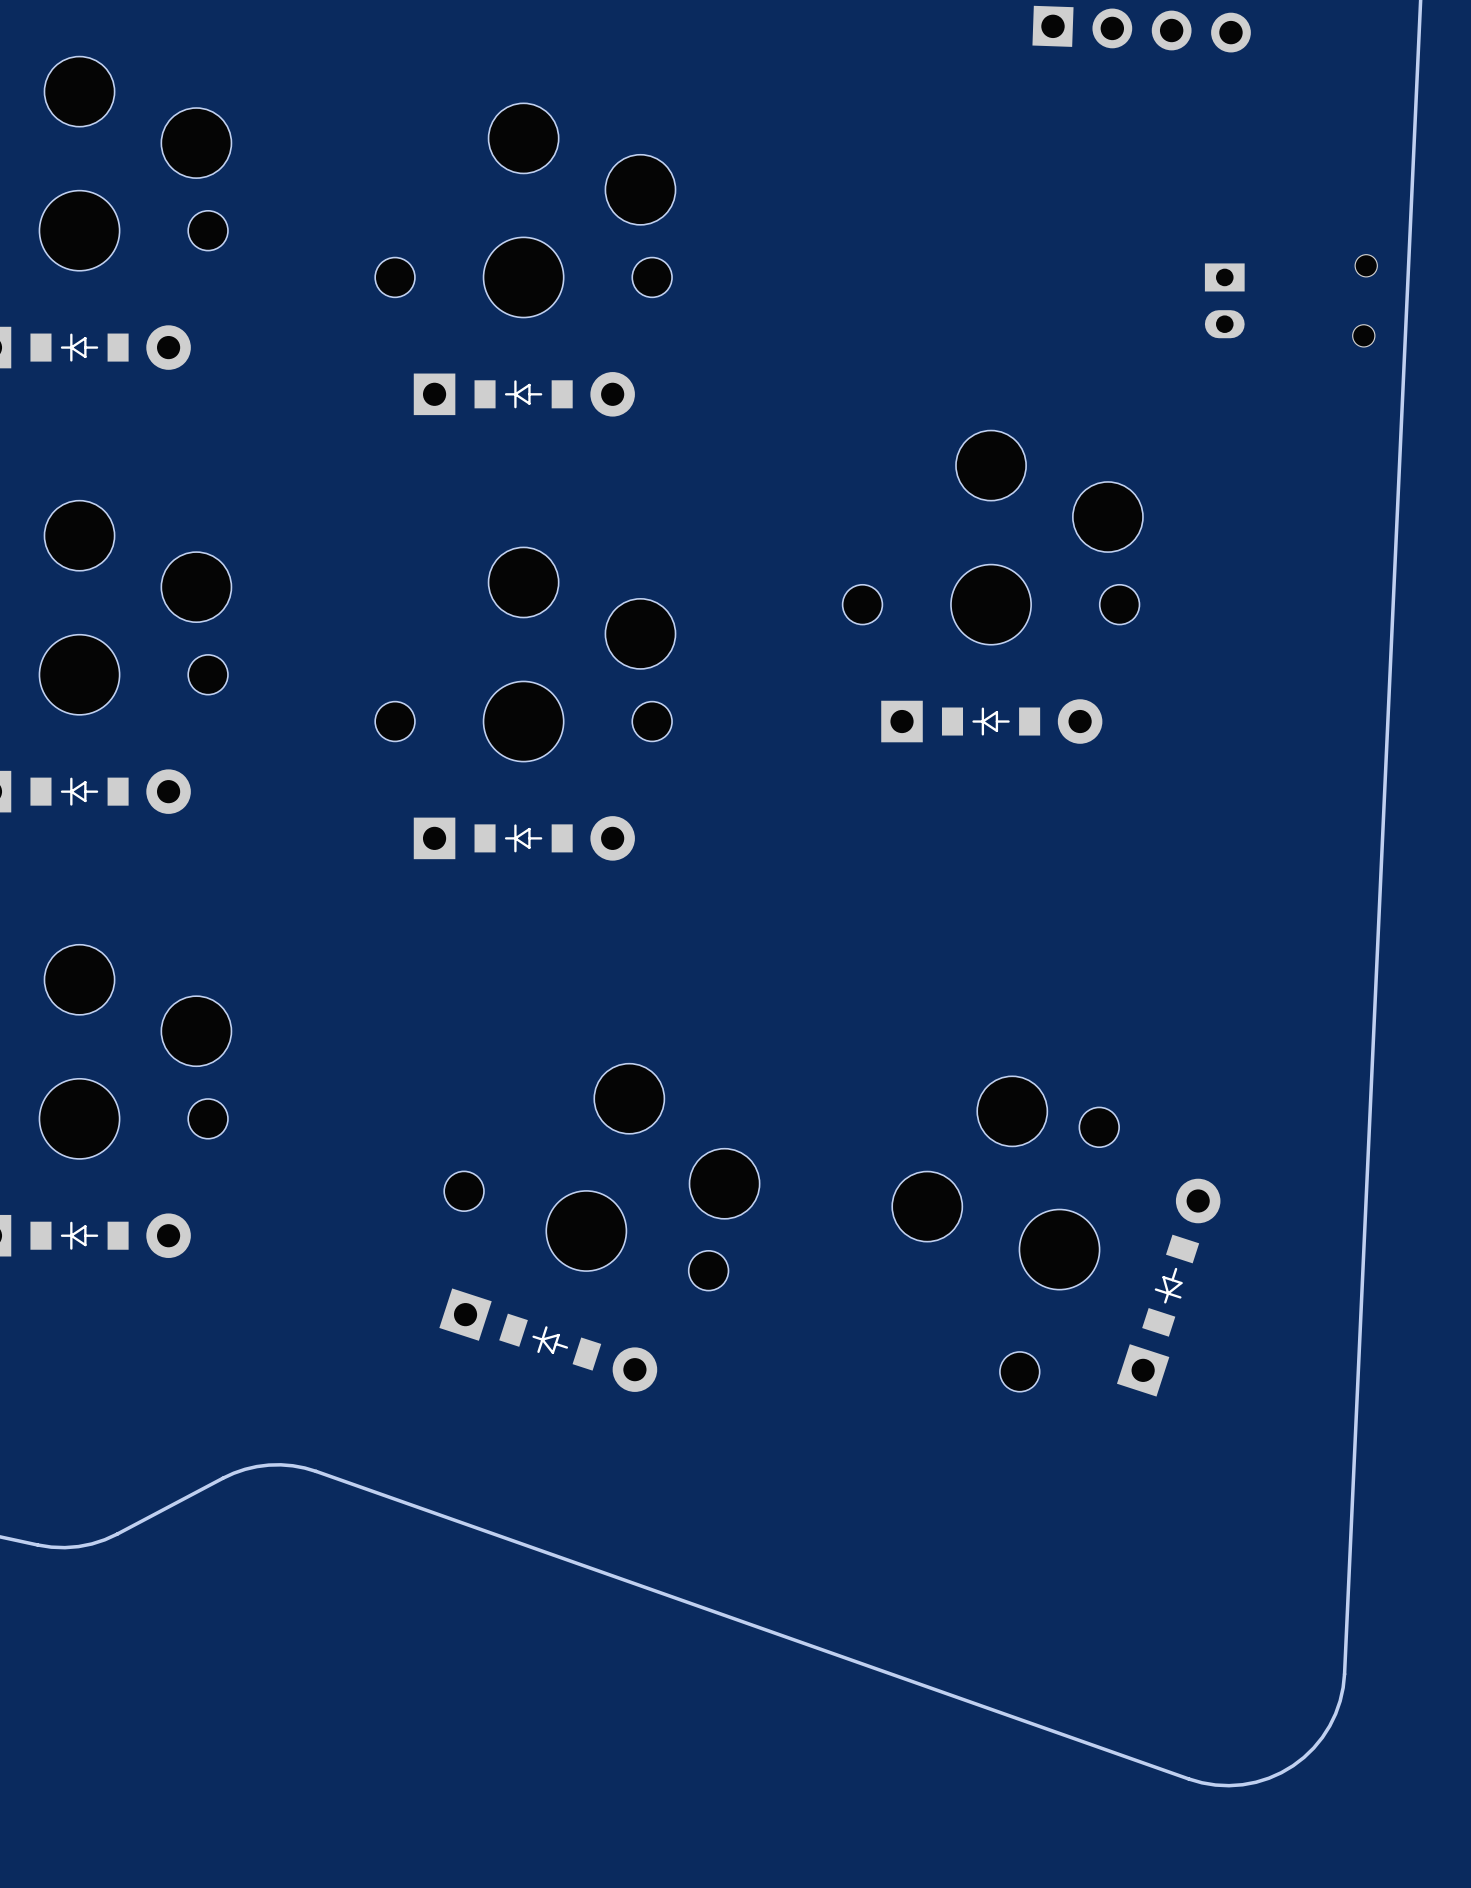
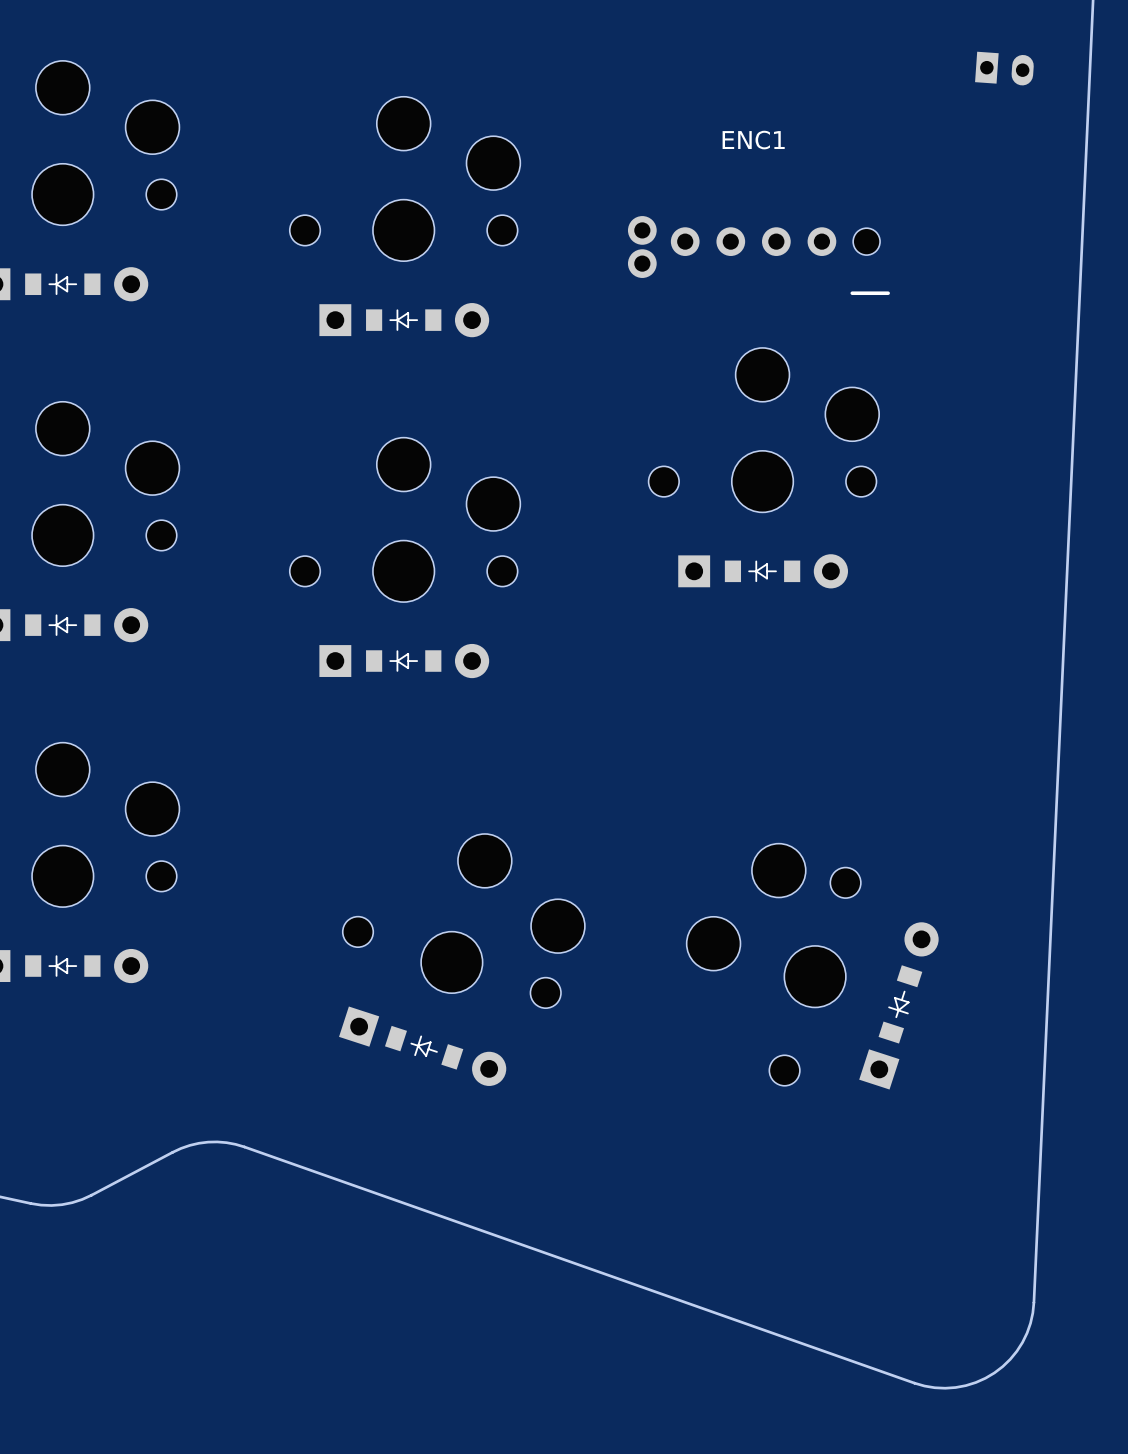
part: (1141, 29) -> none
part: none -> (1004, 68)
part: (1224, 300) -> none
part: (1365, 300) -> none
ENC1: none -> (758, 255)

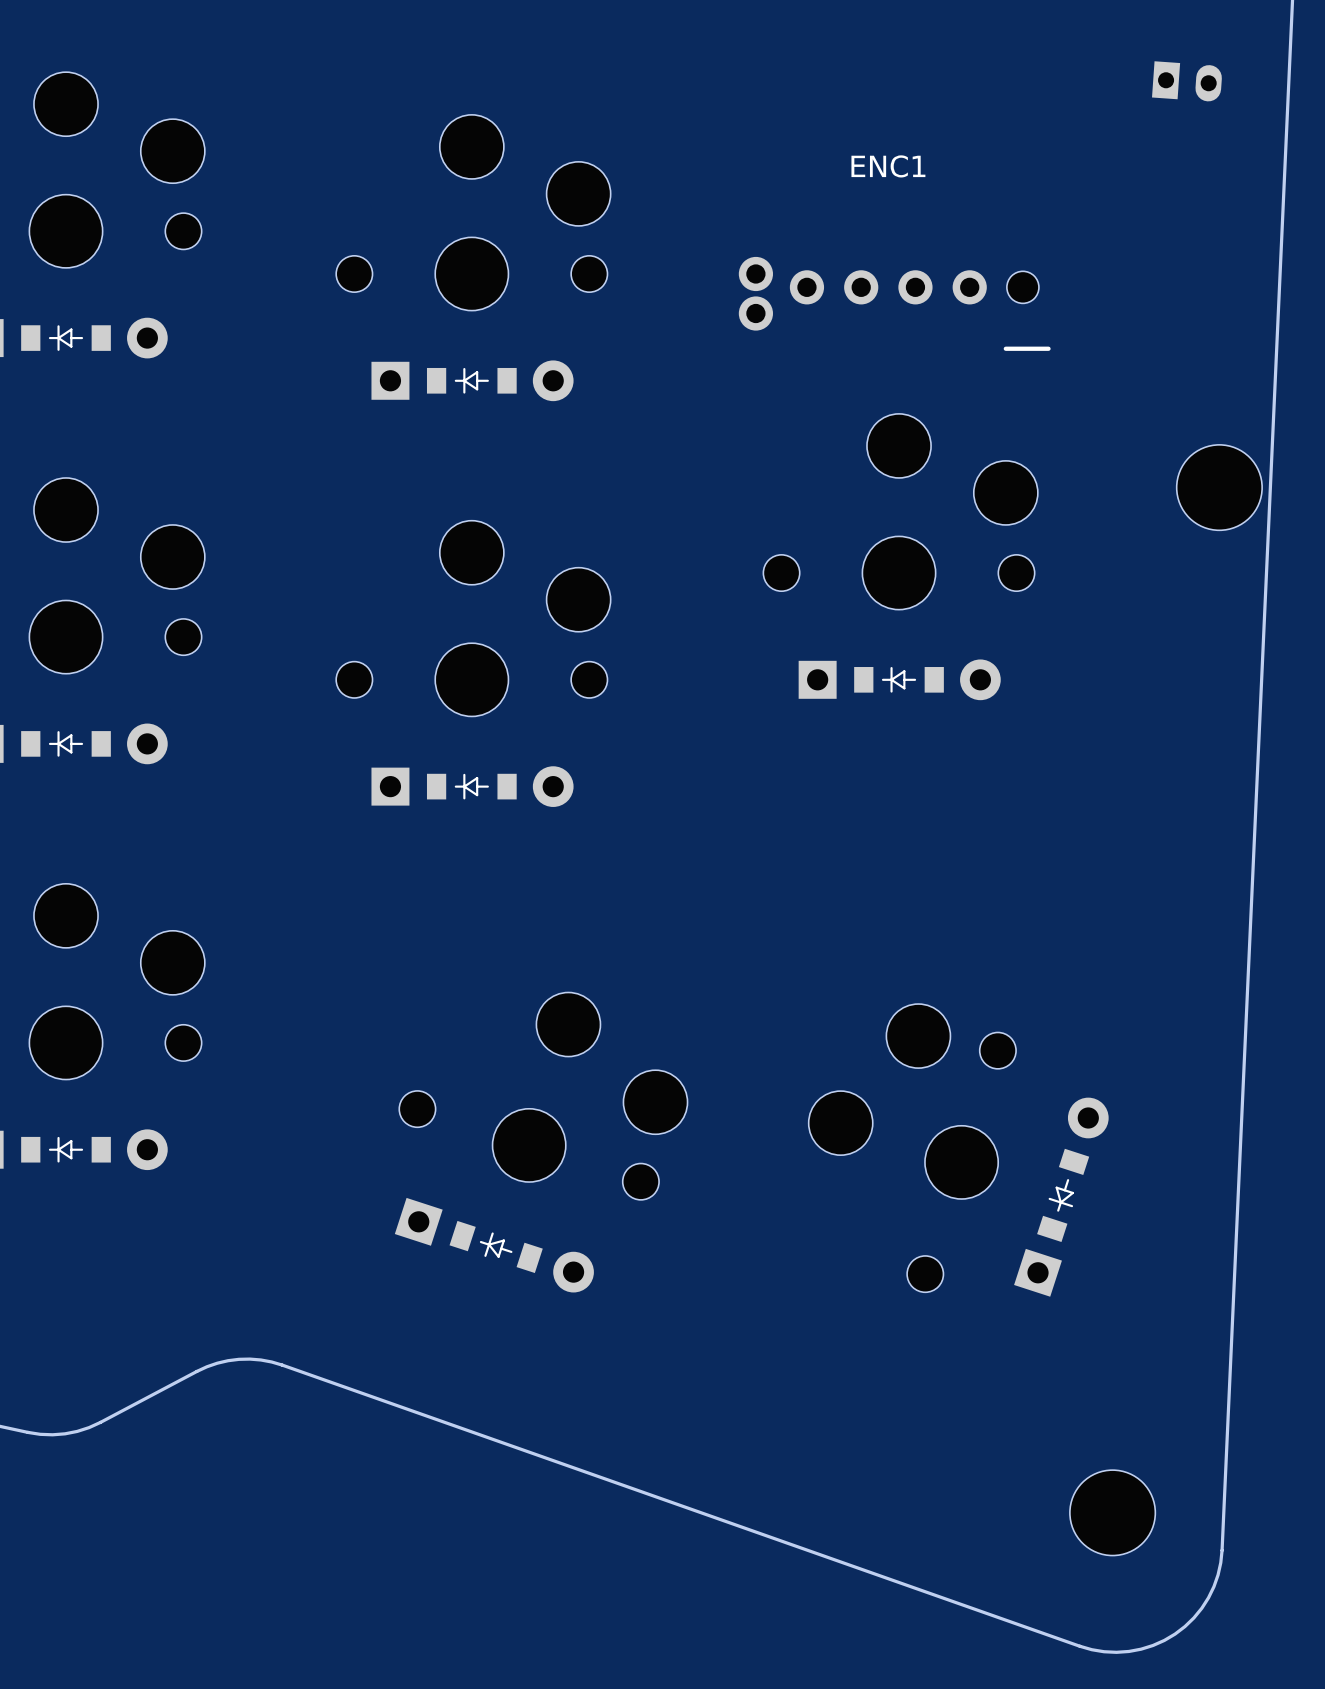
part: none -> (1219, 487)
part: none -> (1112, 1512)

